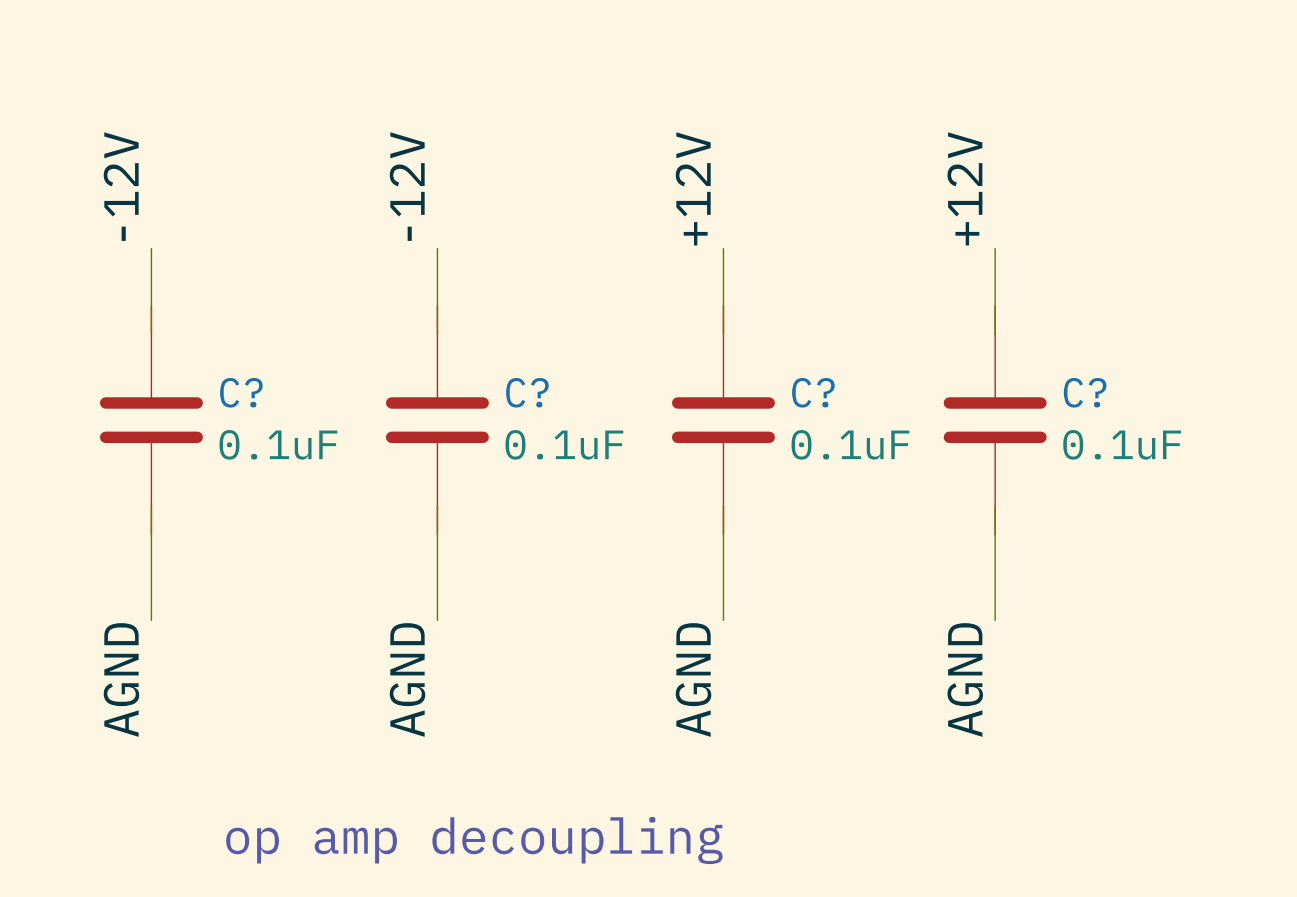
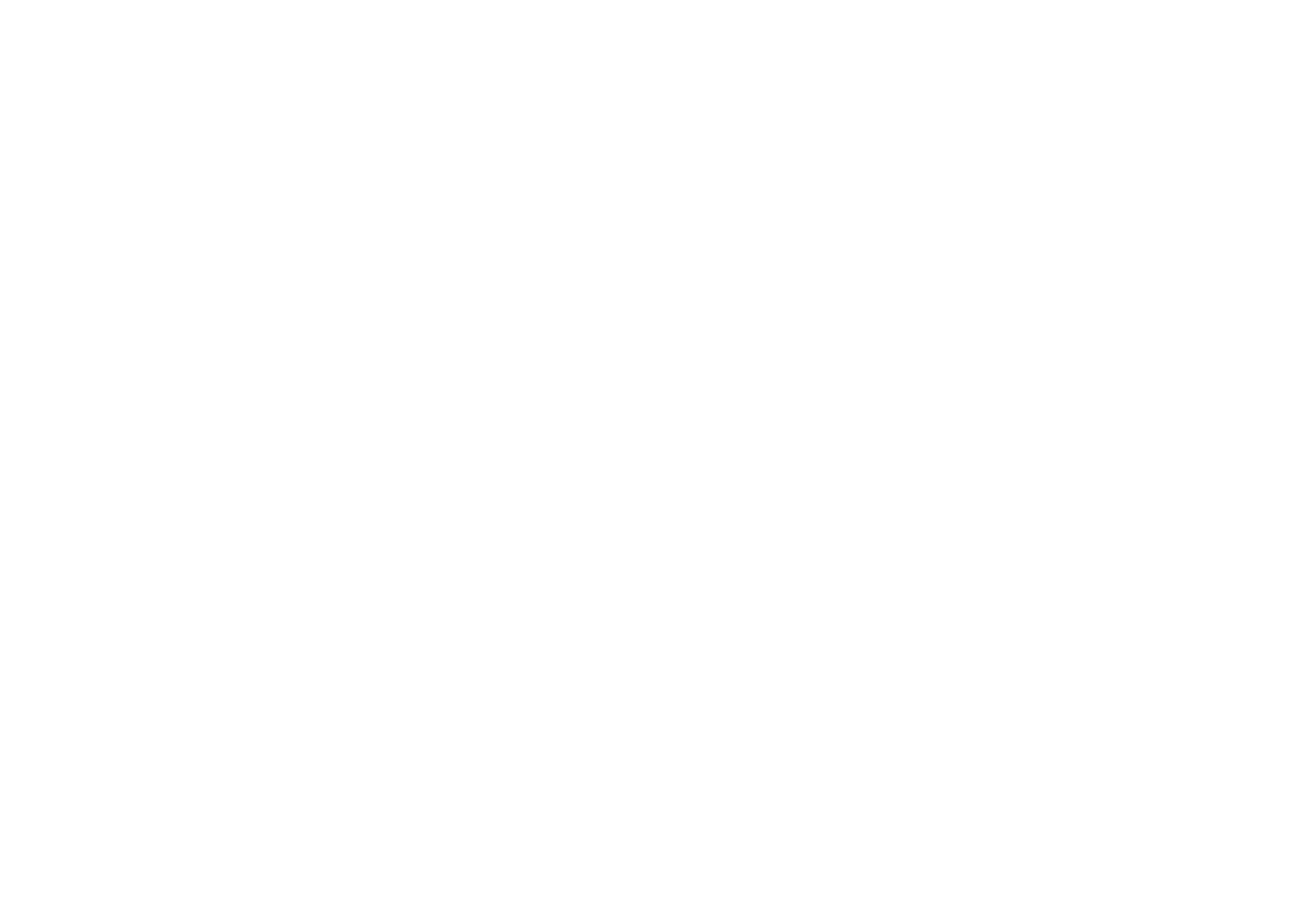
label: -12V (121, 186) -> none
label: -12V (407, 186) -> none
label: +12V (693, 188) -> none
label: +12V (964, 188) -> none
wire: (151, 248) (151, 334) -> none
wire: (437, 248) (437, 334) -> none
wire: (723, 248) (723, 334) -> none
wire: (995, 248) (995, 334) -> none
C?: 0.1uF (151, 420) -> none
C?: 0.1uF (437, 420) -> none
C?: 0.1uF (723, 420) -> none
C?: 0.1uF (995, 420) -> none
wire: (151, 505) (151, 620) -> none
wire: (437, 505) (437, 620) -> none
wire: (723, 505) (723, 620) -> none
wire: (995, 505) (995, 620) -> none
label: AGND (121, 679) -> none
label: AGND (407, 679) -> none
label: AGND (693, 679) -> none
label: AGND (965, 679) -> none
text: op amp decoupling (474, 840) -> none

